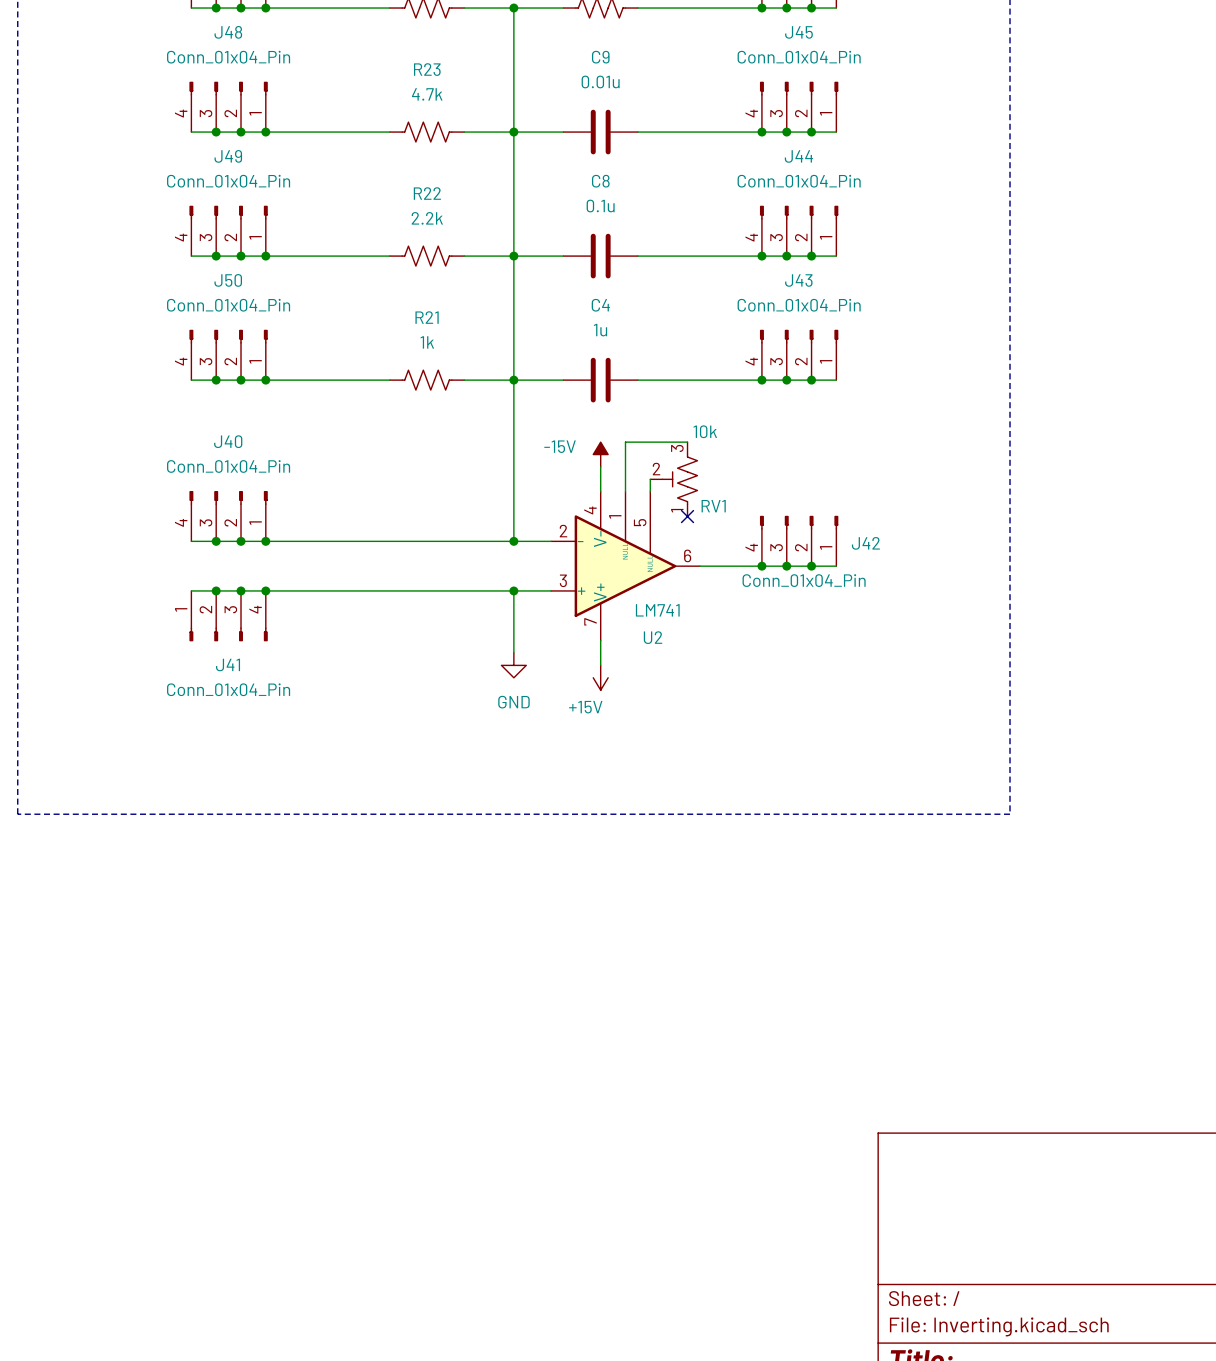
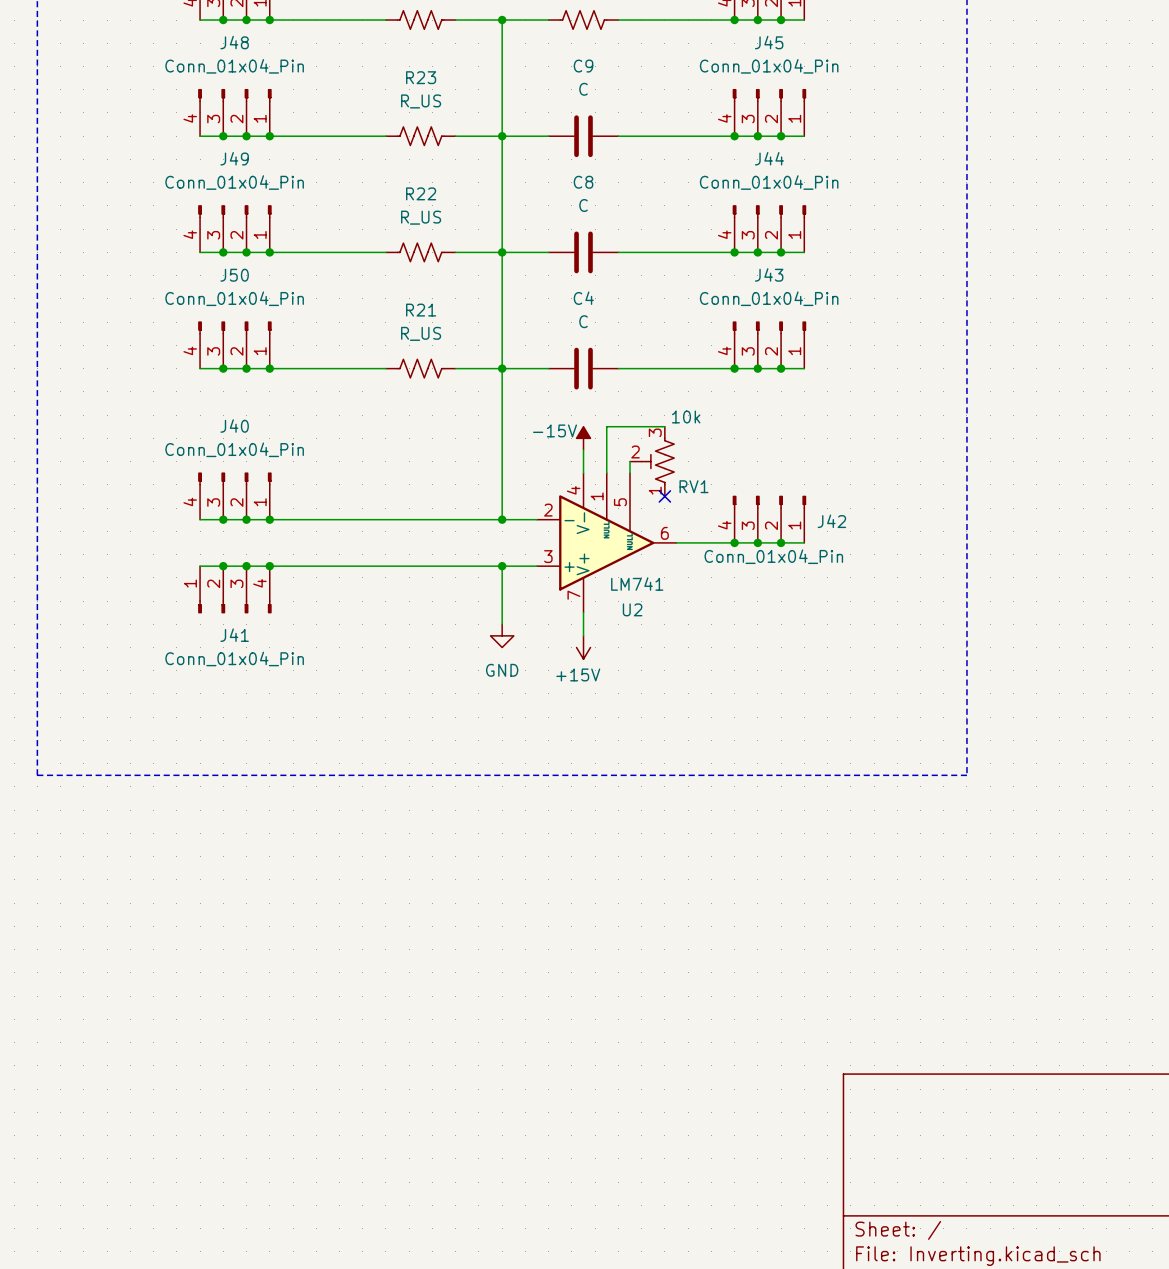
C9 value: 0.01u (600, 81) -> C (583, 89)
R23 value: 4.7k (427, 94) -> R_US (421, 101)
C8 value: 0.1u (600, 206) -> C (583, 205)
R22 value: 2.2k (427, 218) -> R_US (421, 217)
C4 value: 1u (600, 330) -> C (583, 321)
R21 value: 1k (427, 342) -> R_US (421, 333)

